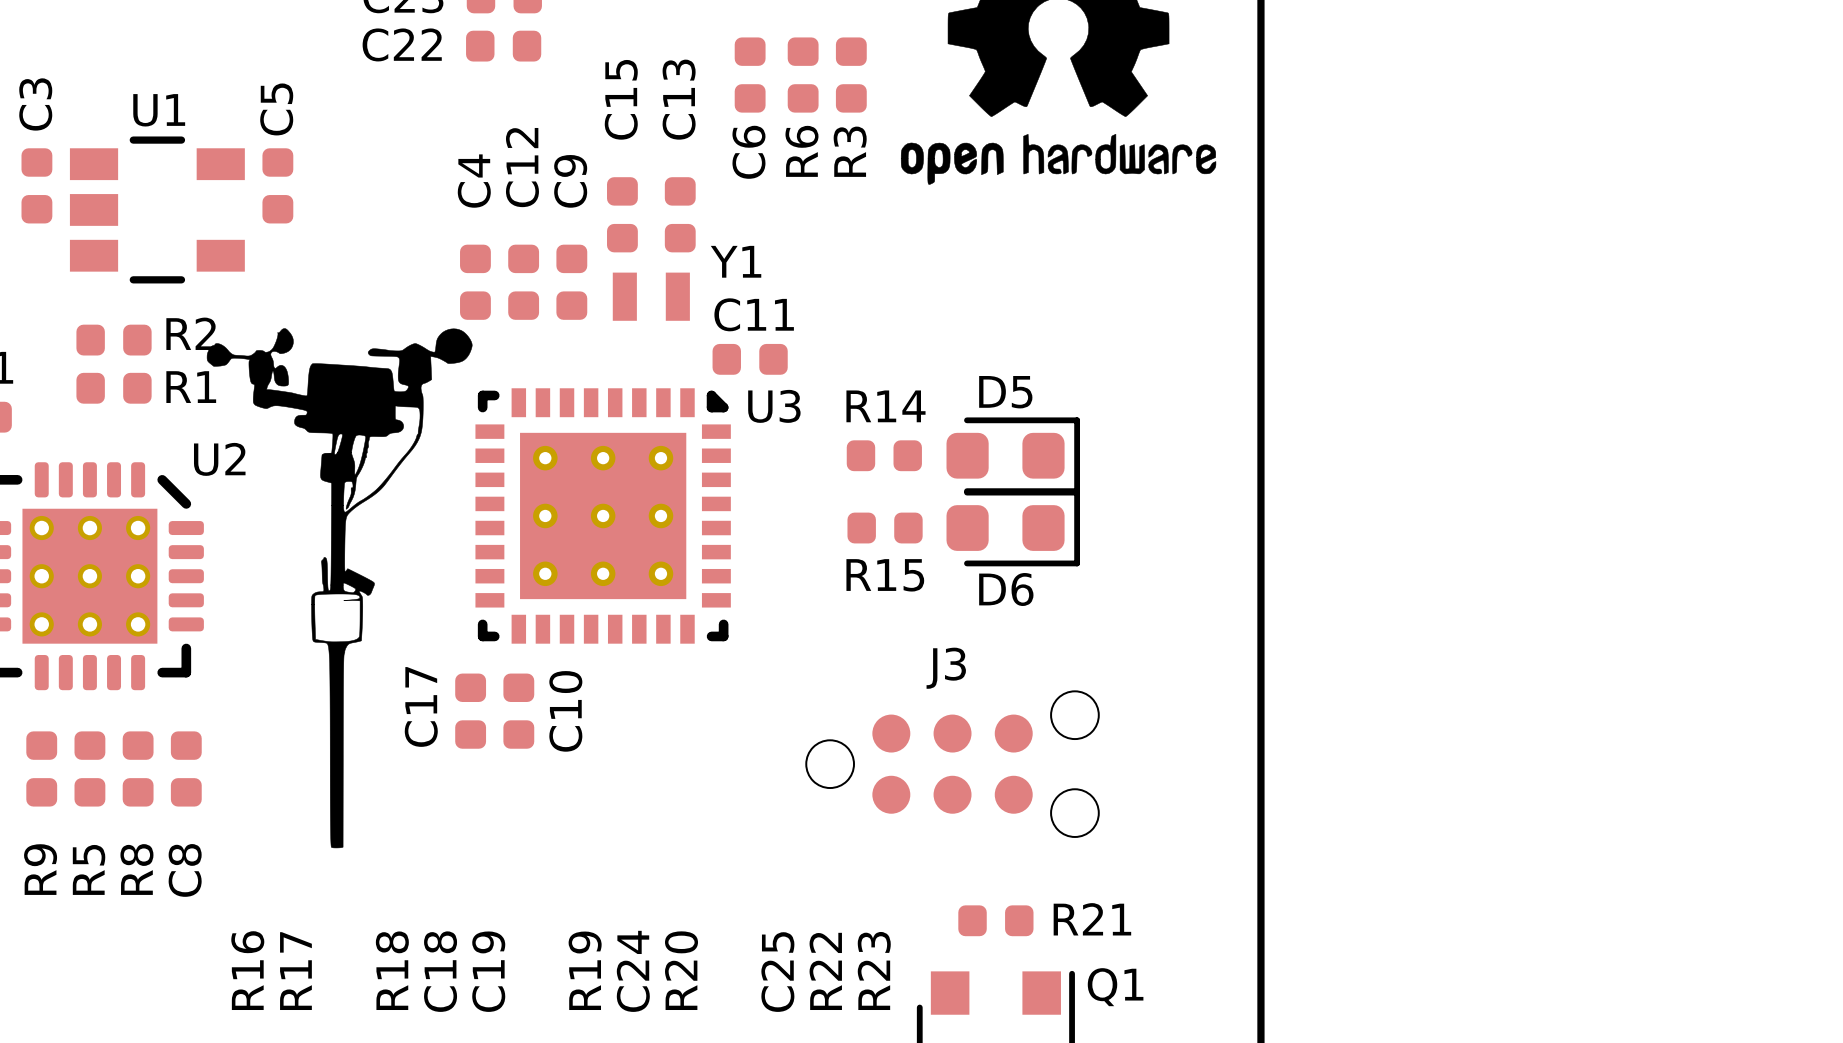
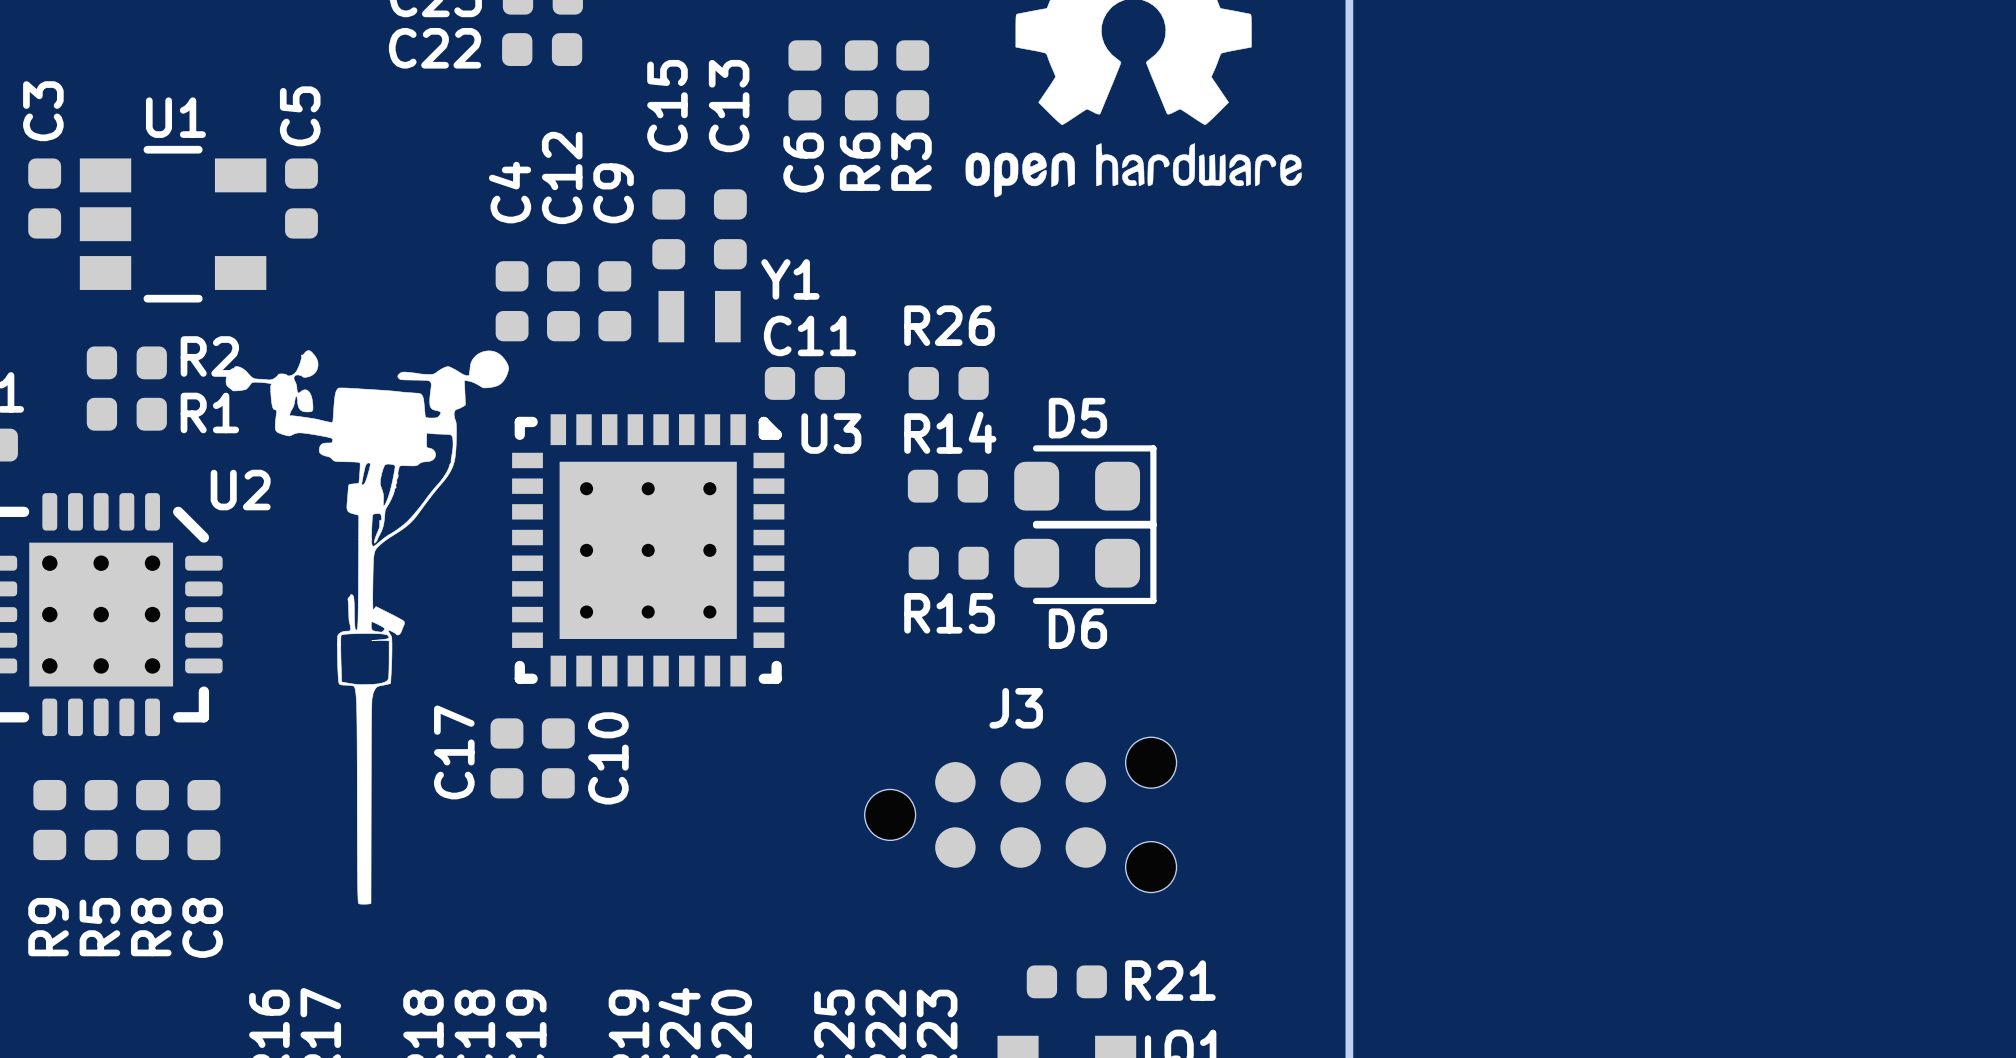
R26: none -> (948, 383)

